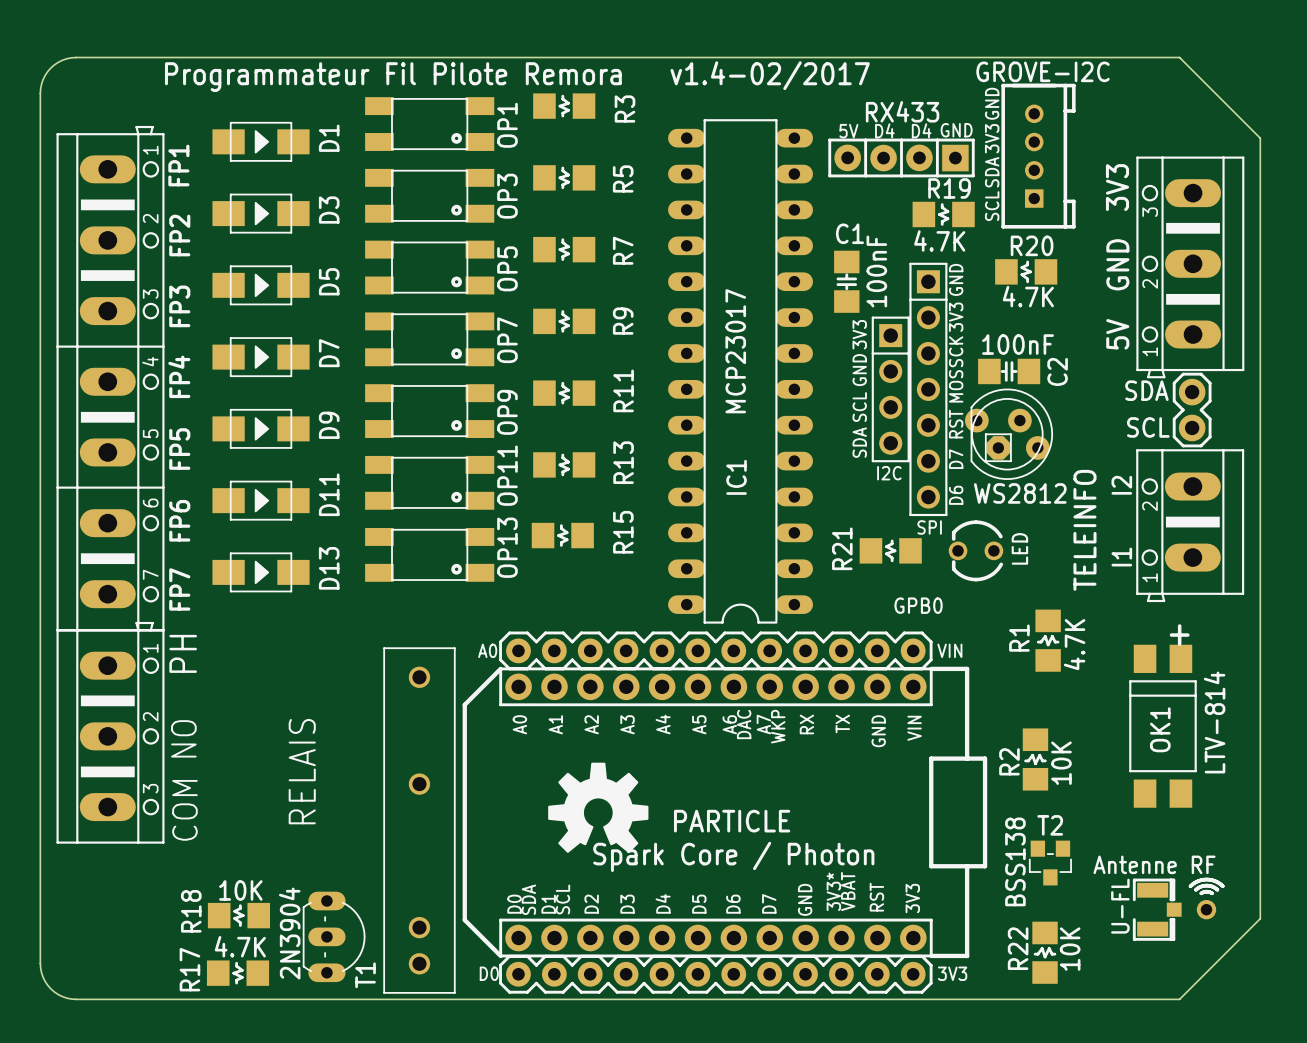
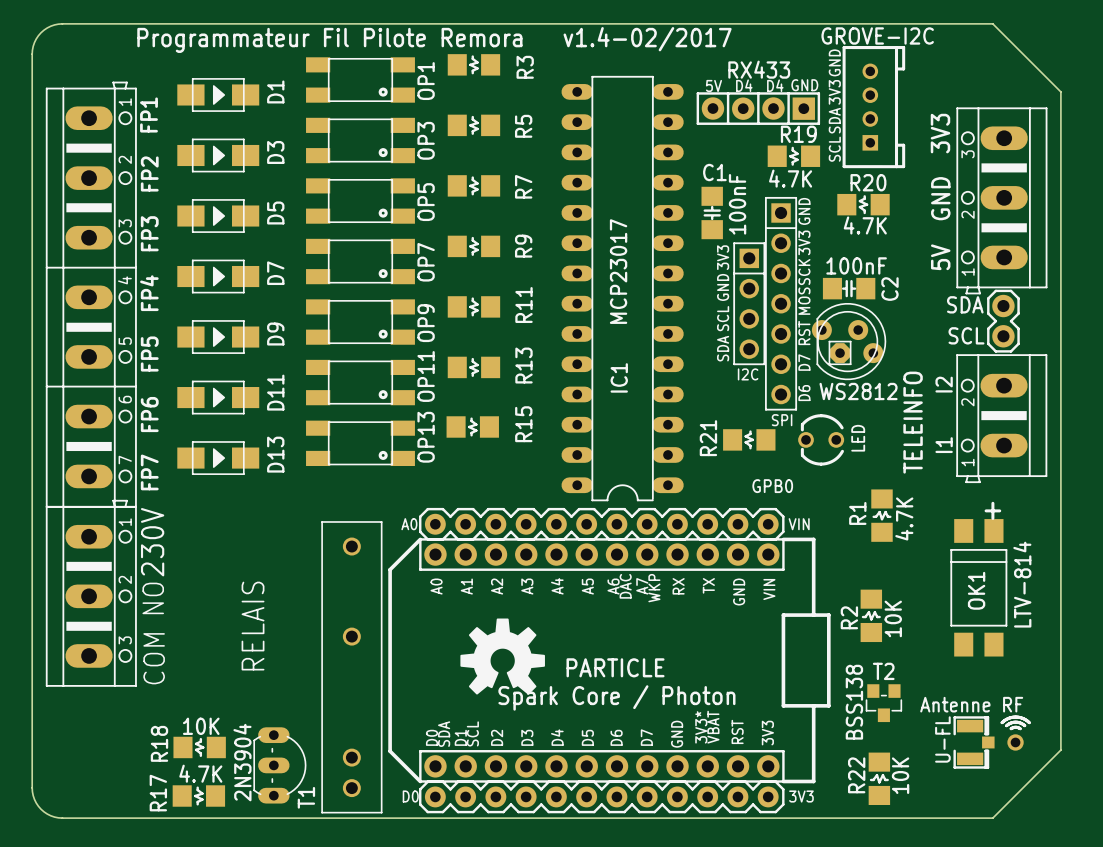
PH name: PH (183, 653) -> 230V (152, 542)

